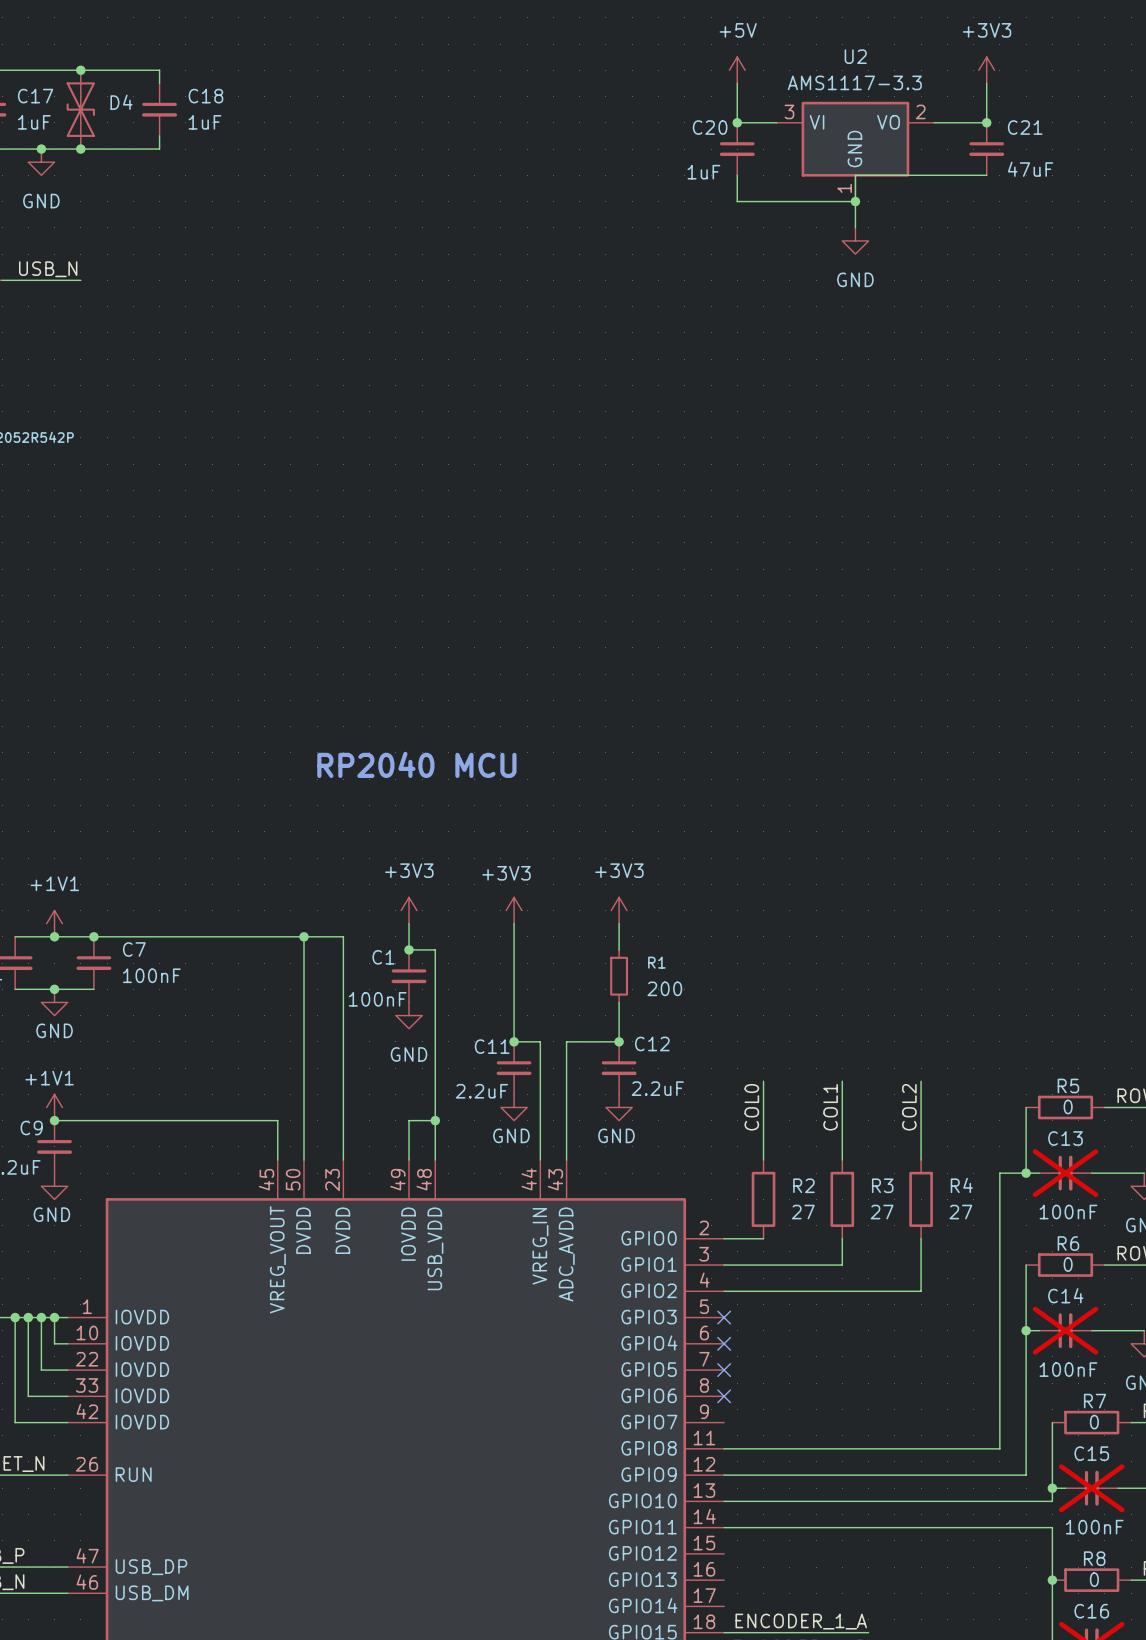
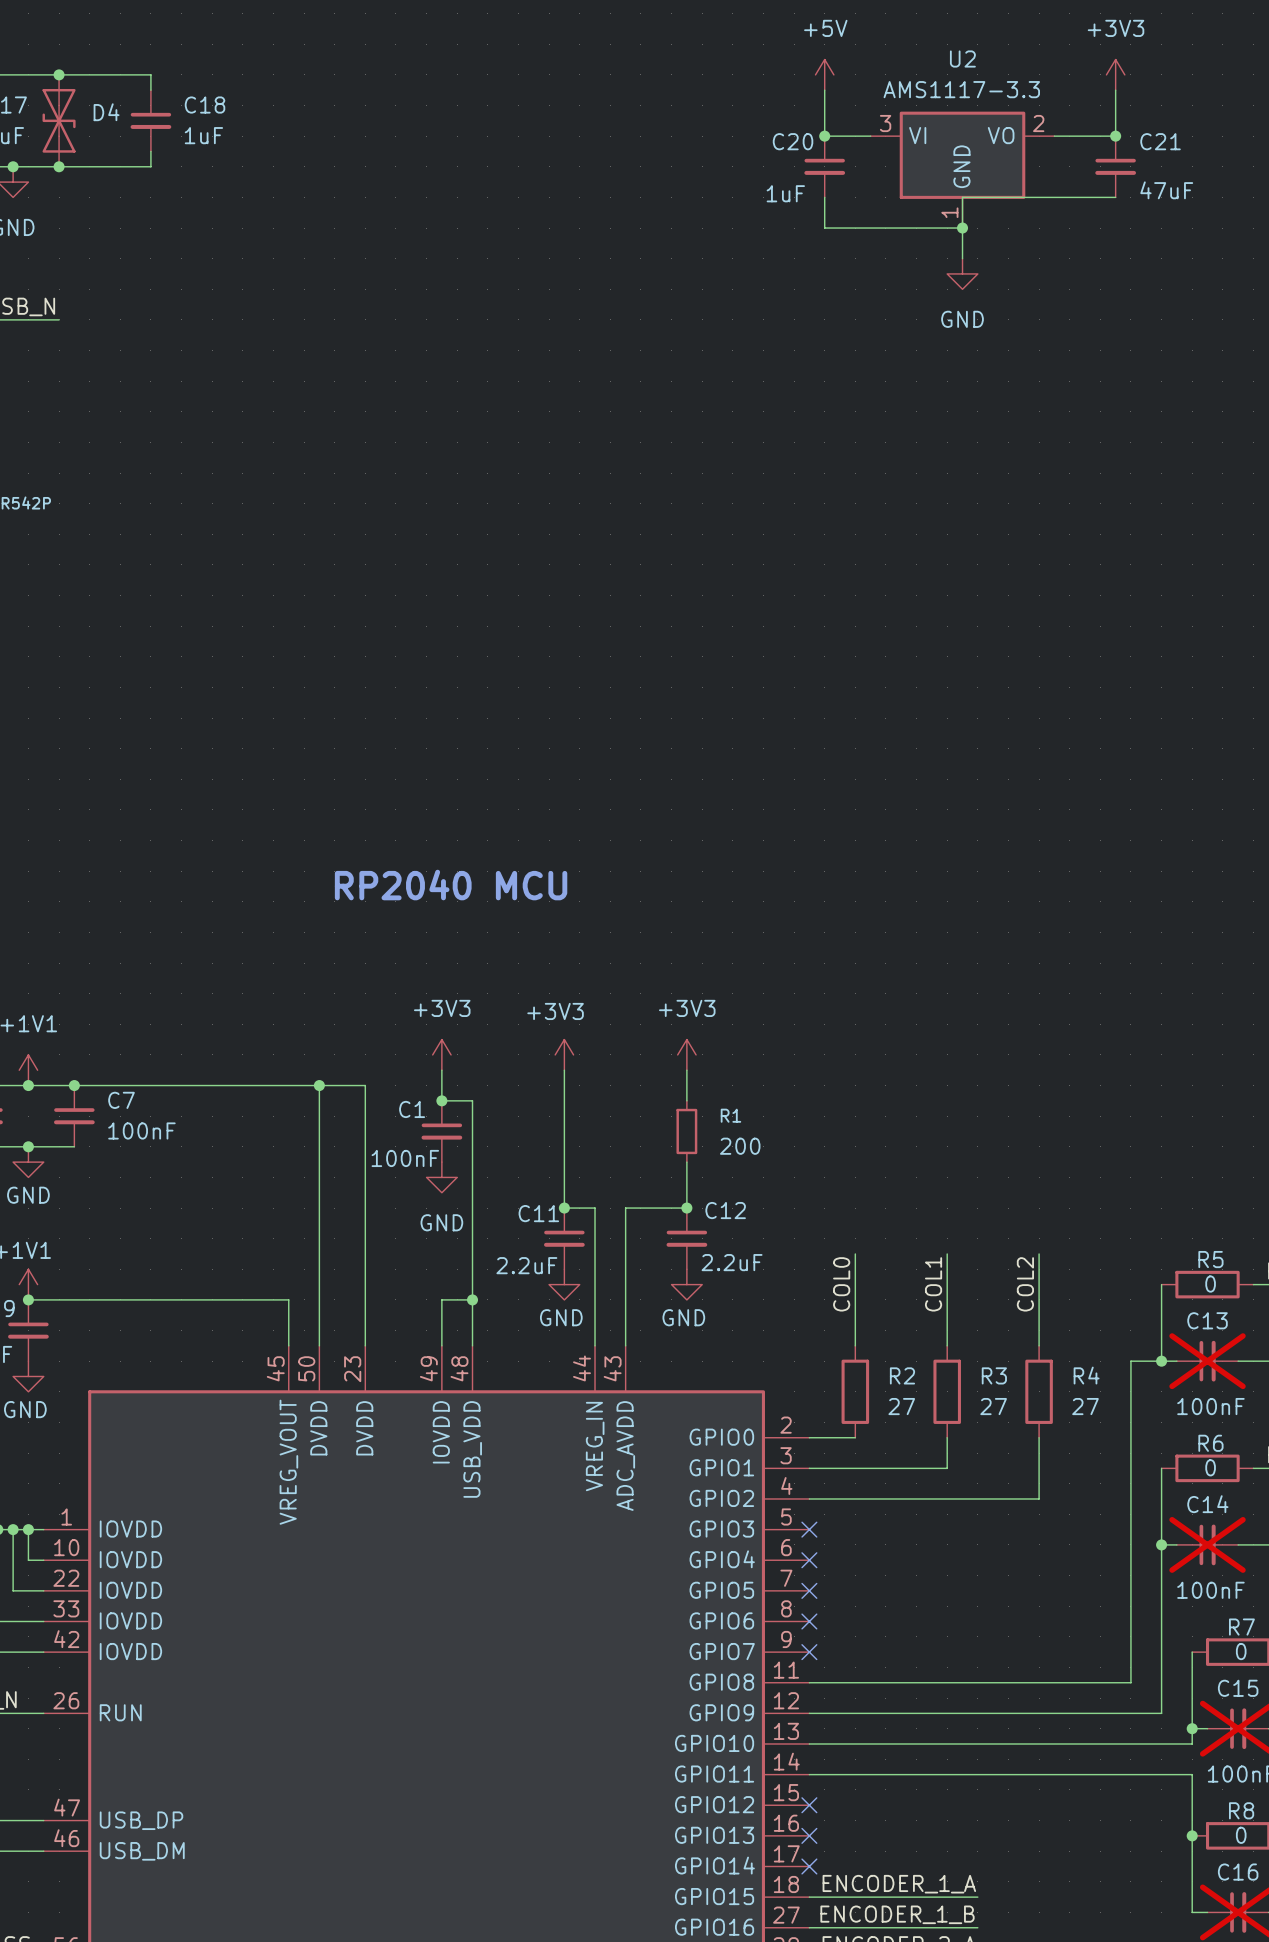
no-connect mark: none -> (809, 1652)
no-connect mark: none -> (809, 1805)
no-connect mark: none -> (809, 1835)
no-connect mark: none -> (809, 1866)

